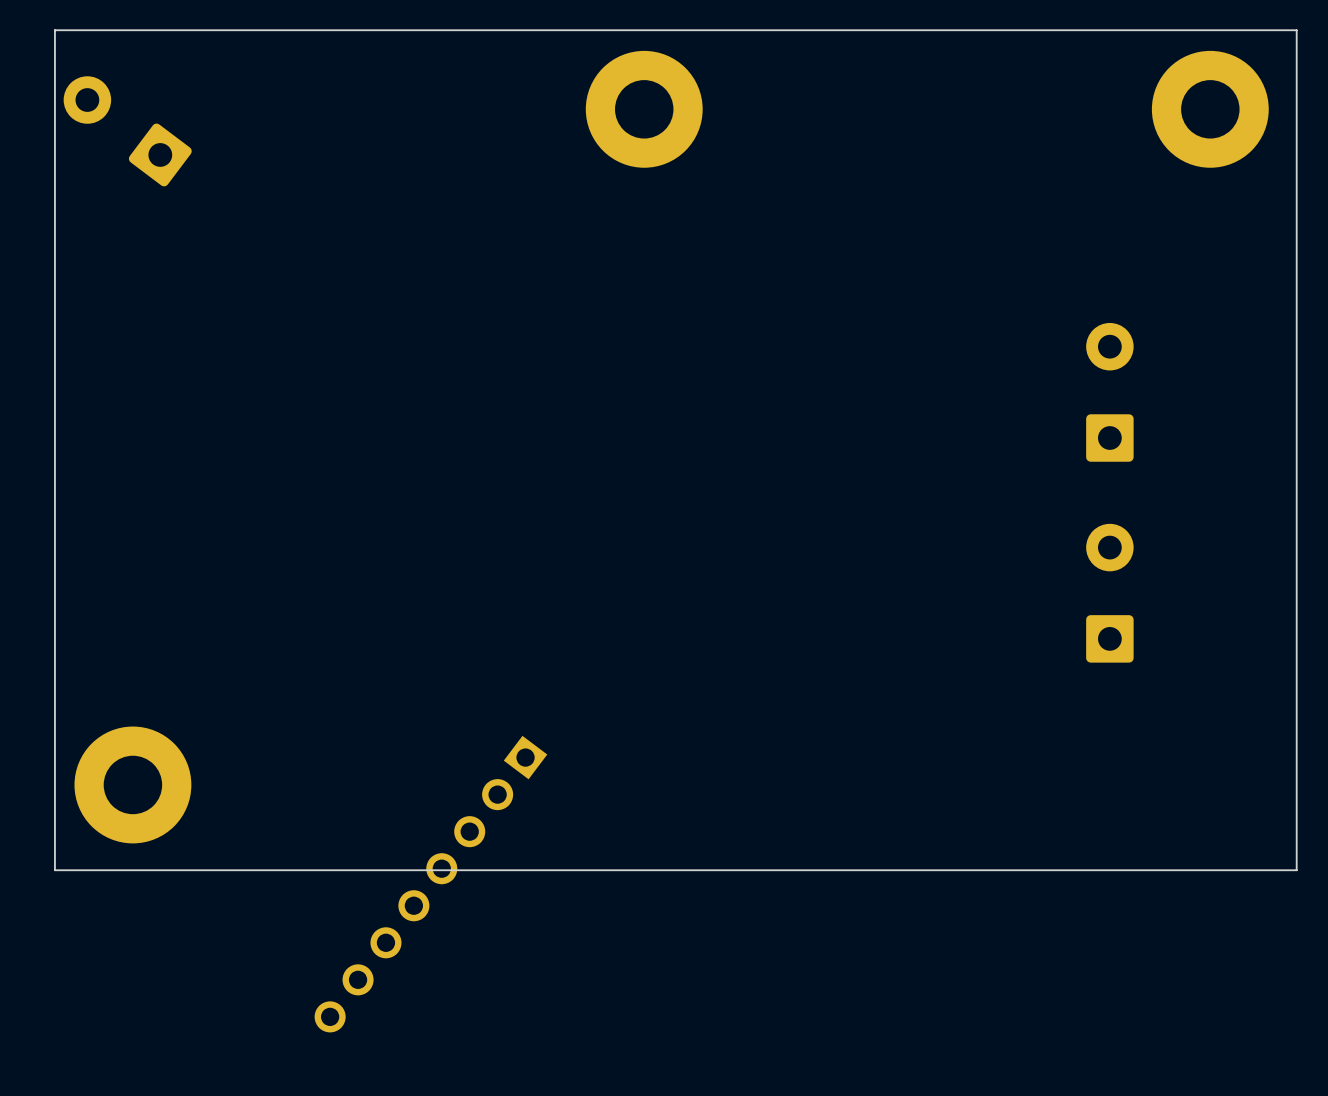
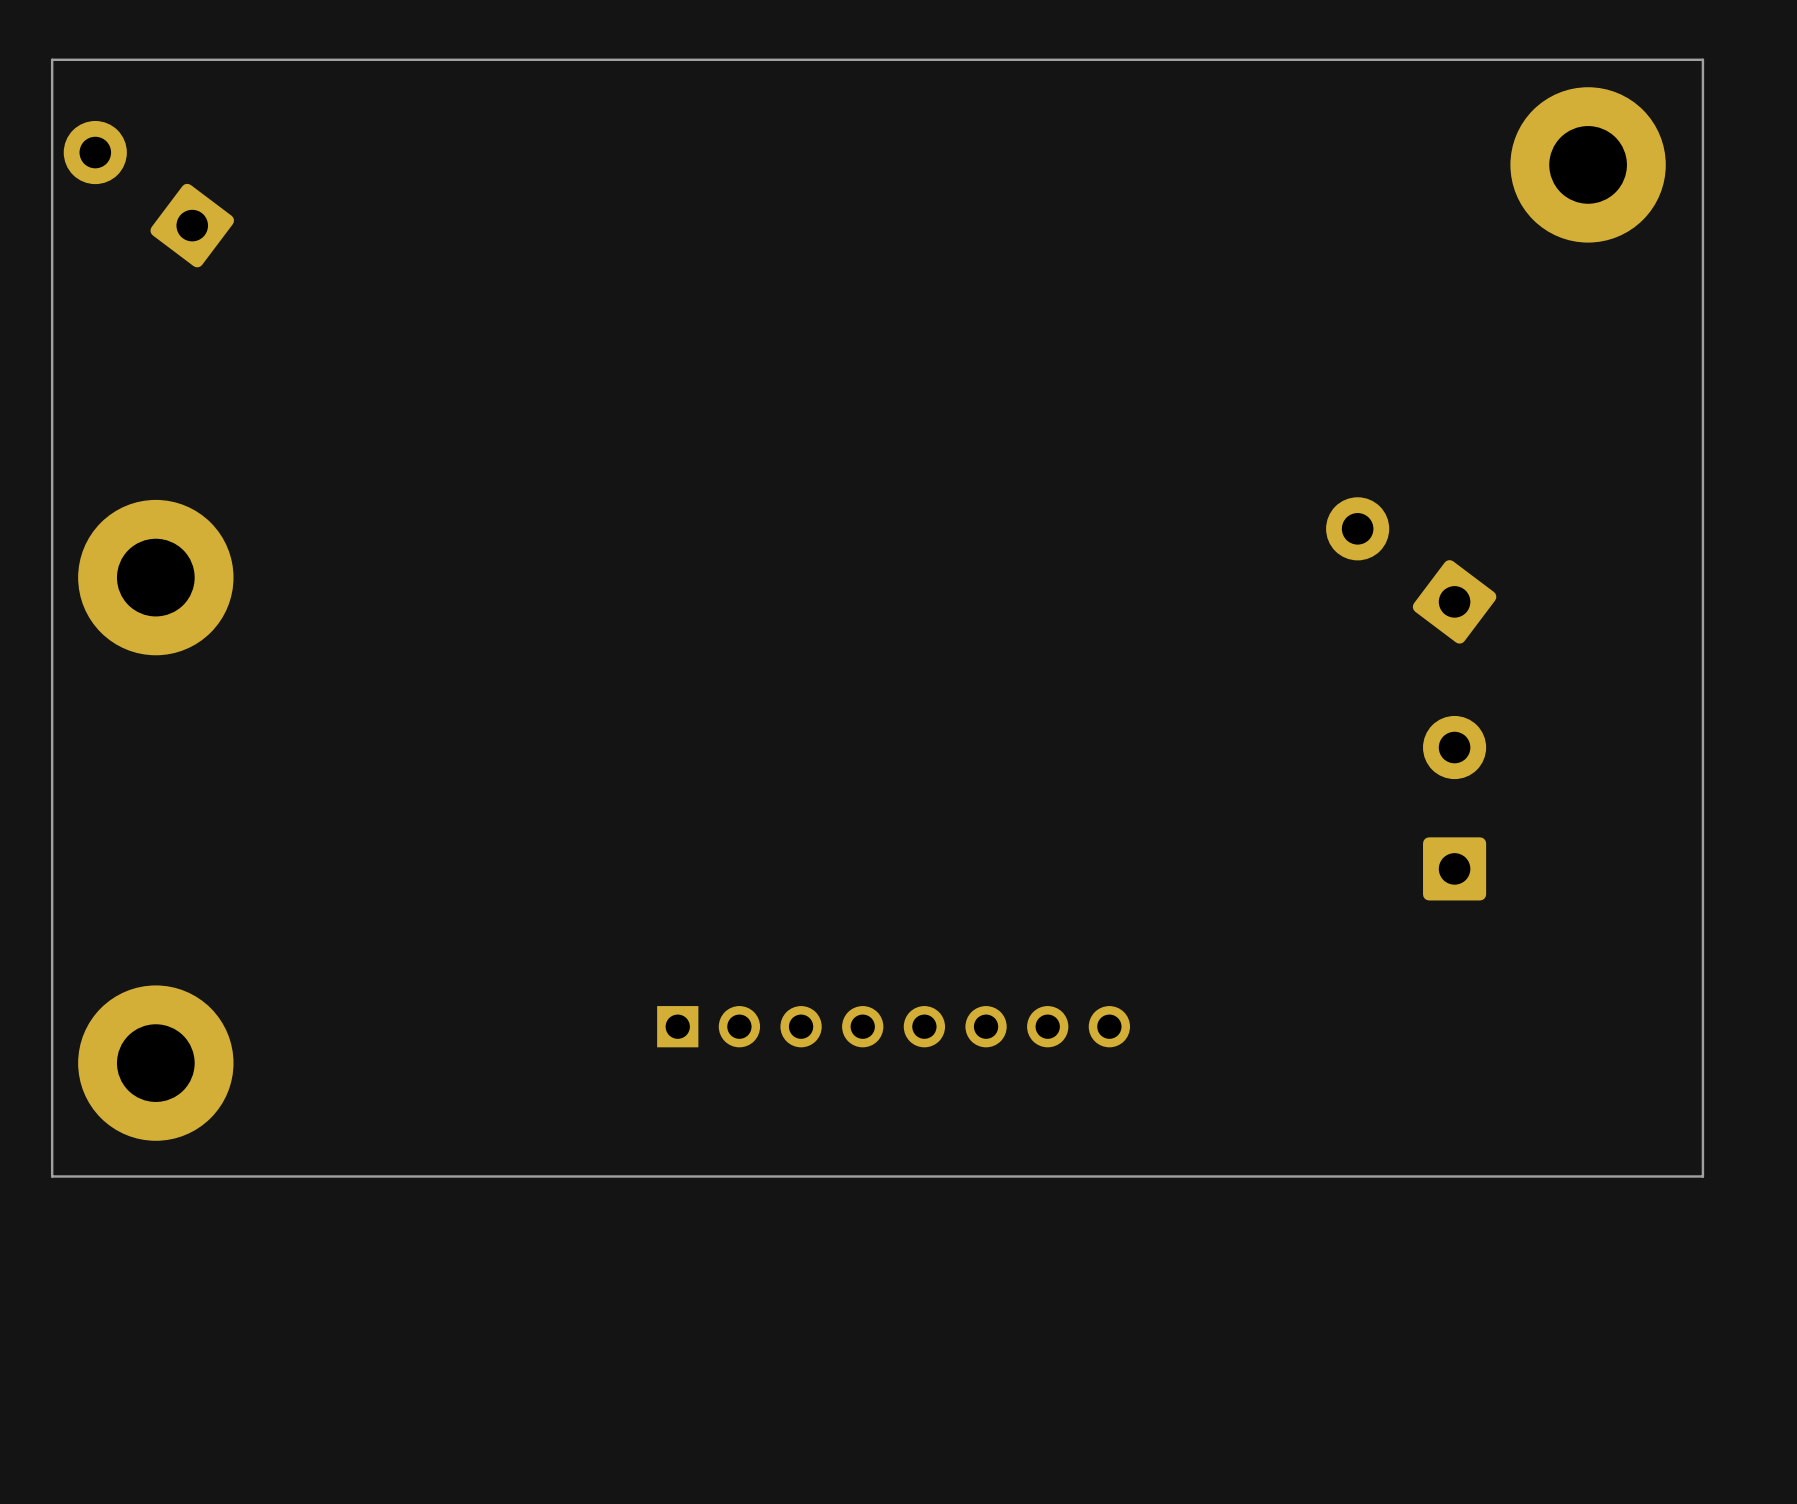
part: (644, 109) -> none
part: (1109, 392) -> none
part: none -> (1411, 570)
part: none -> (155, 577)
part: none -> (893, 1026)
part: (430, 884) -> none

